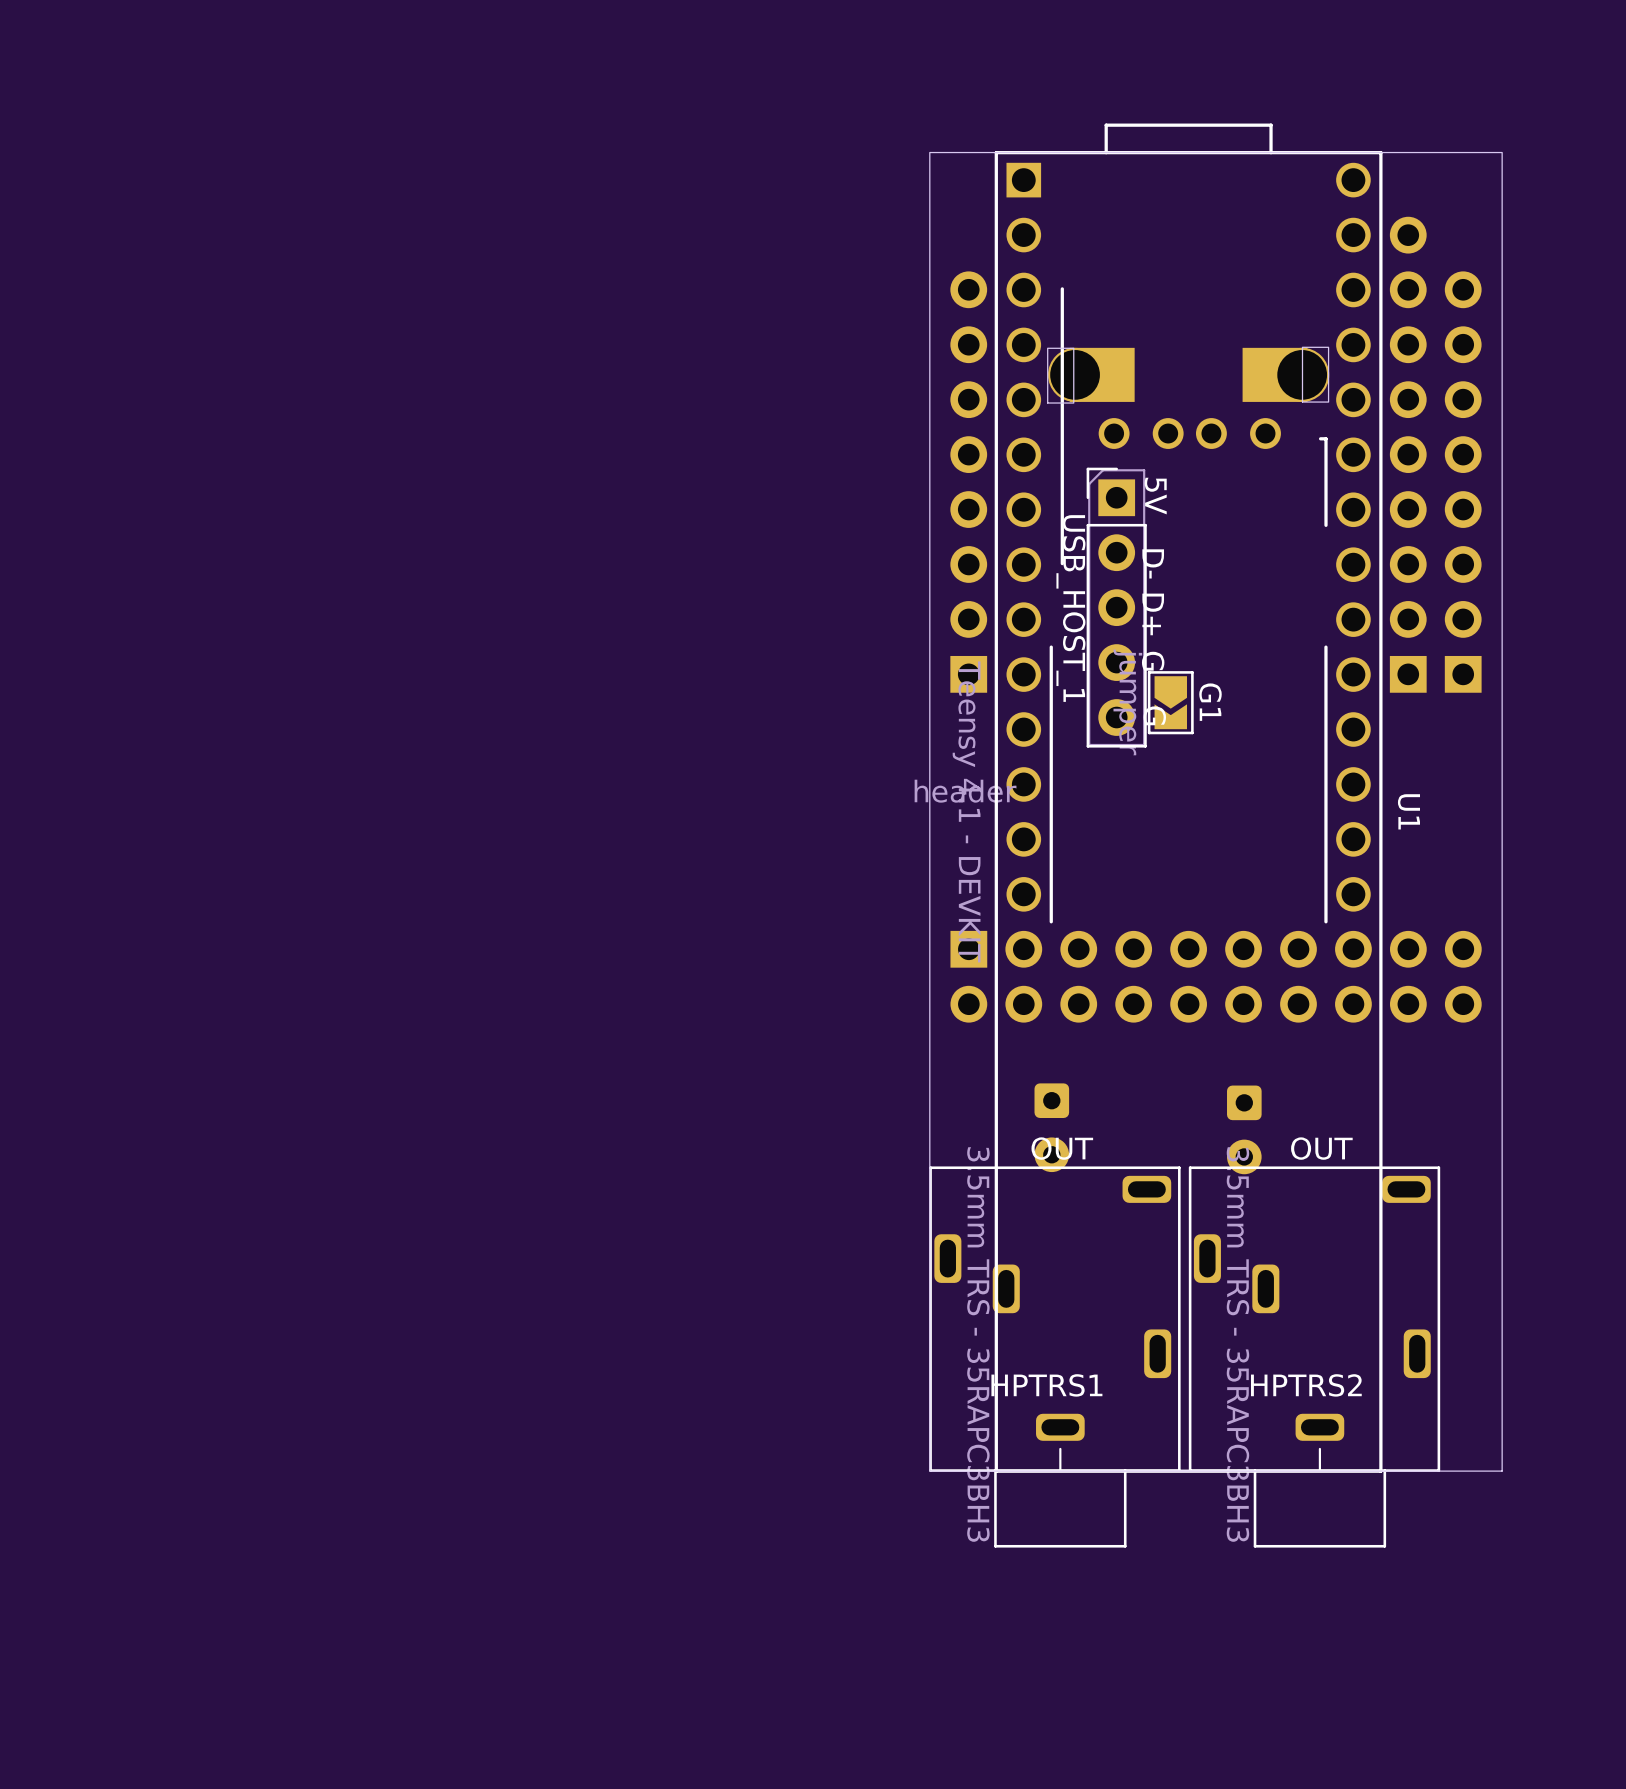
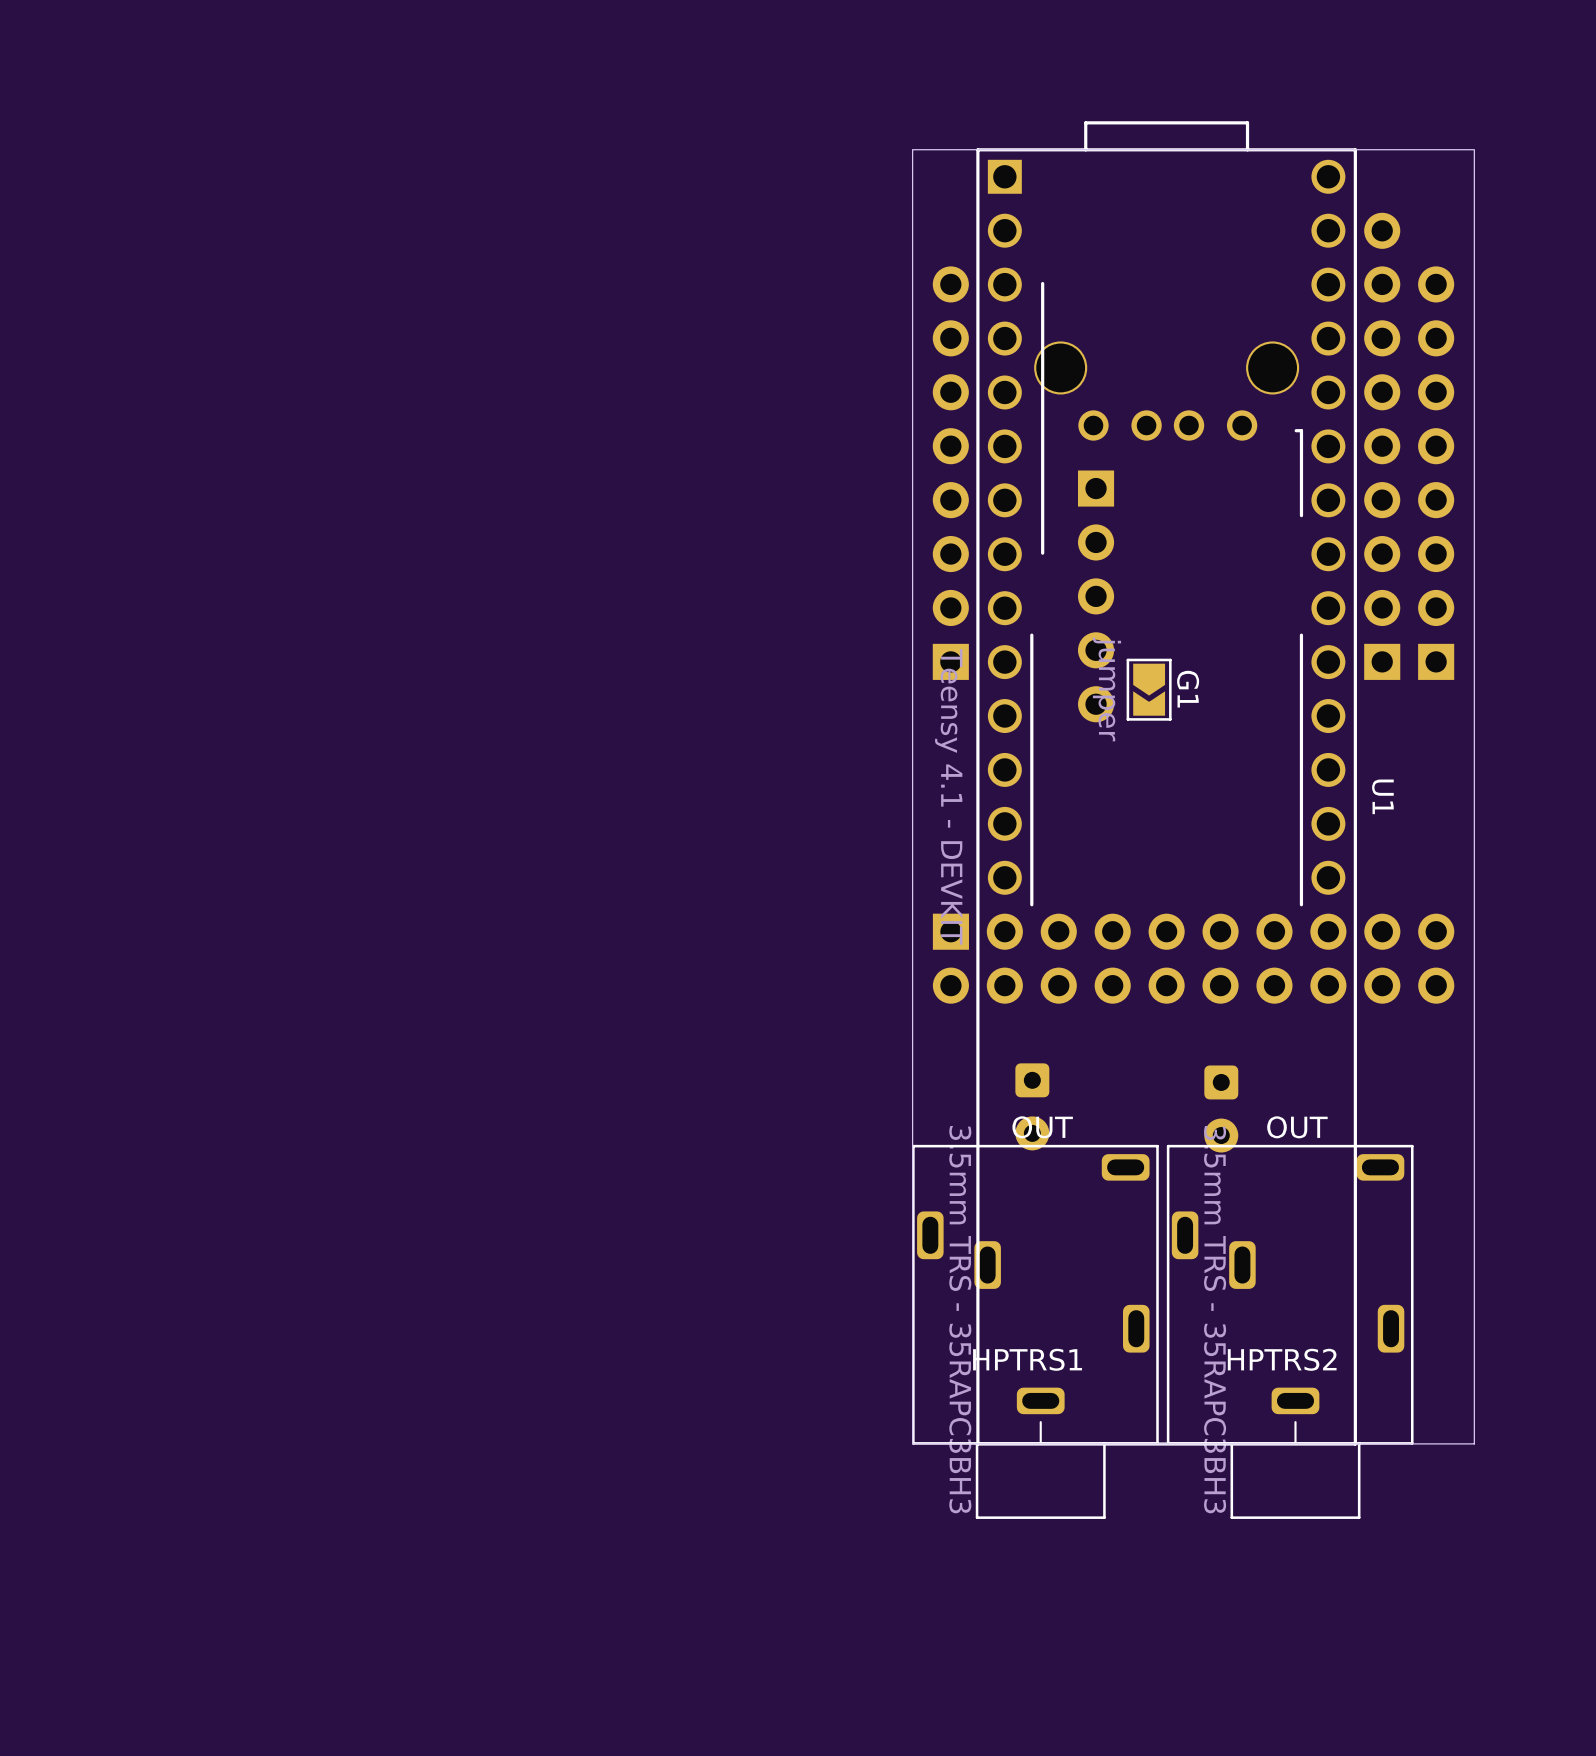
part footprint: [1047, 346, 1330, 449] -> [1034, 341, 1300, 441]
USB_HOST_1 side: bottom (1116, 607) -> top (1096, 596)

